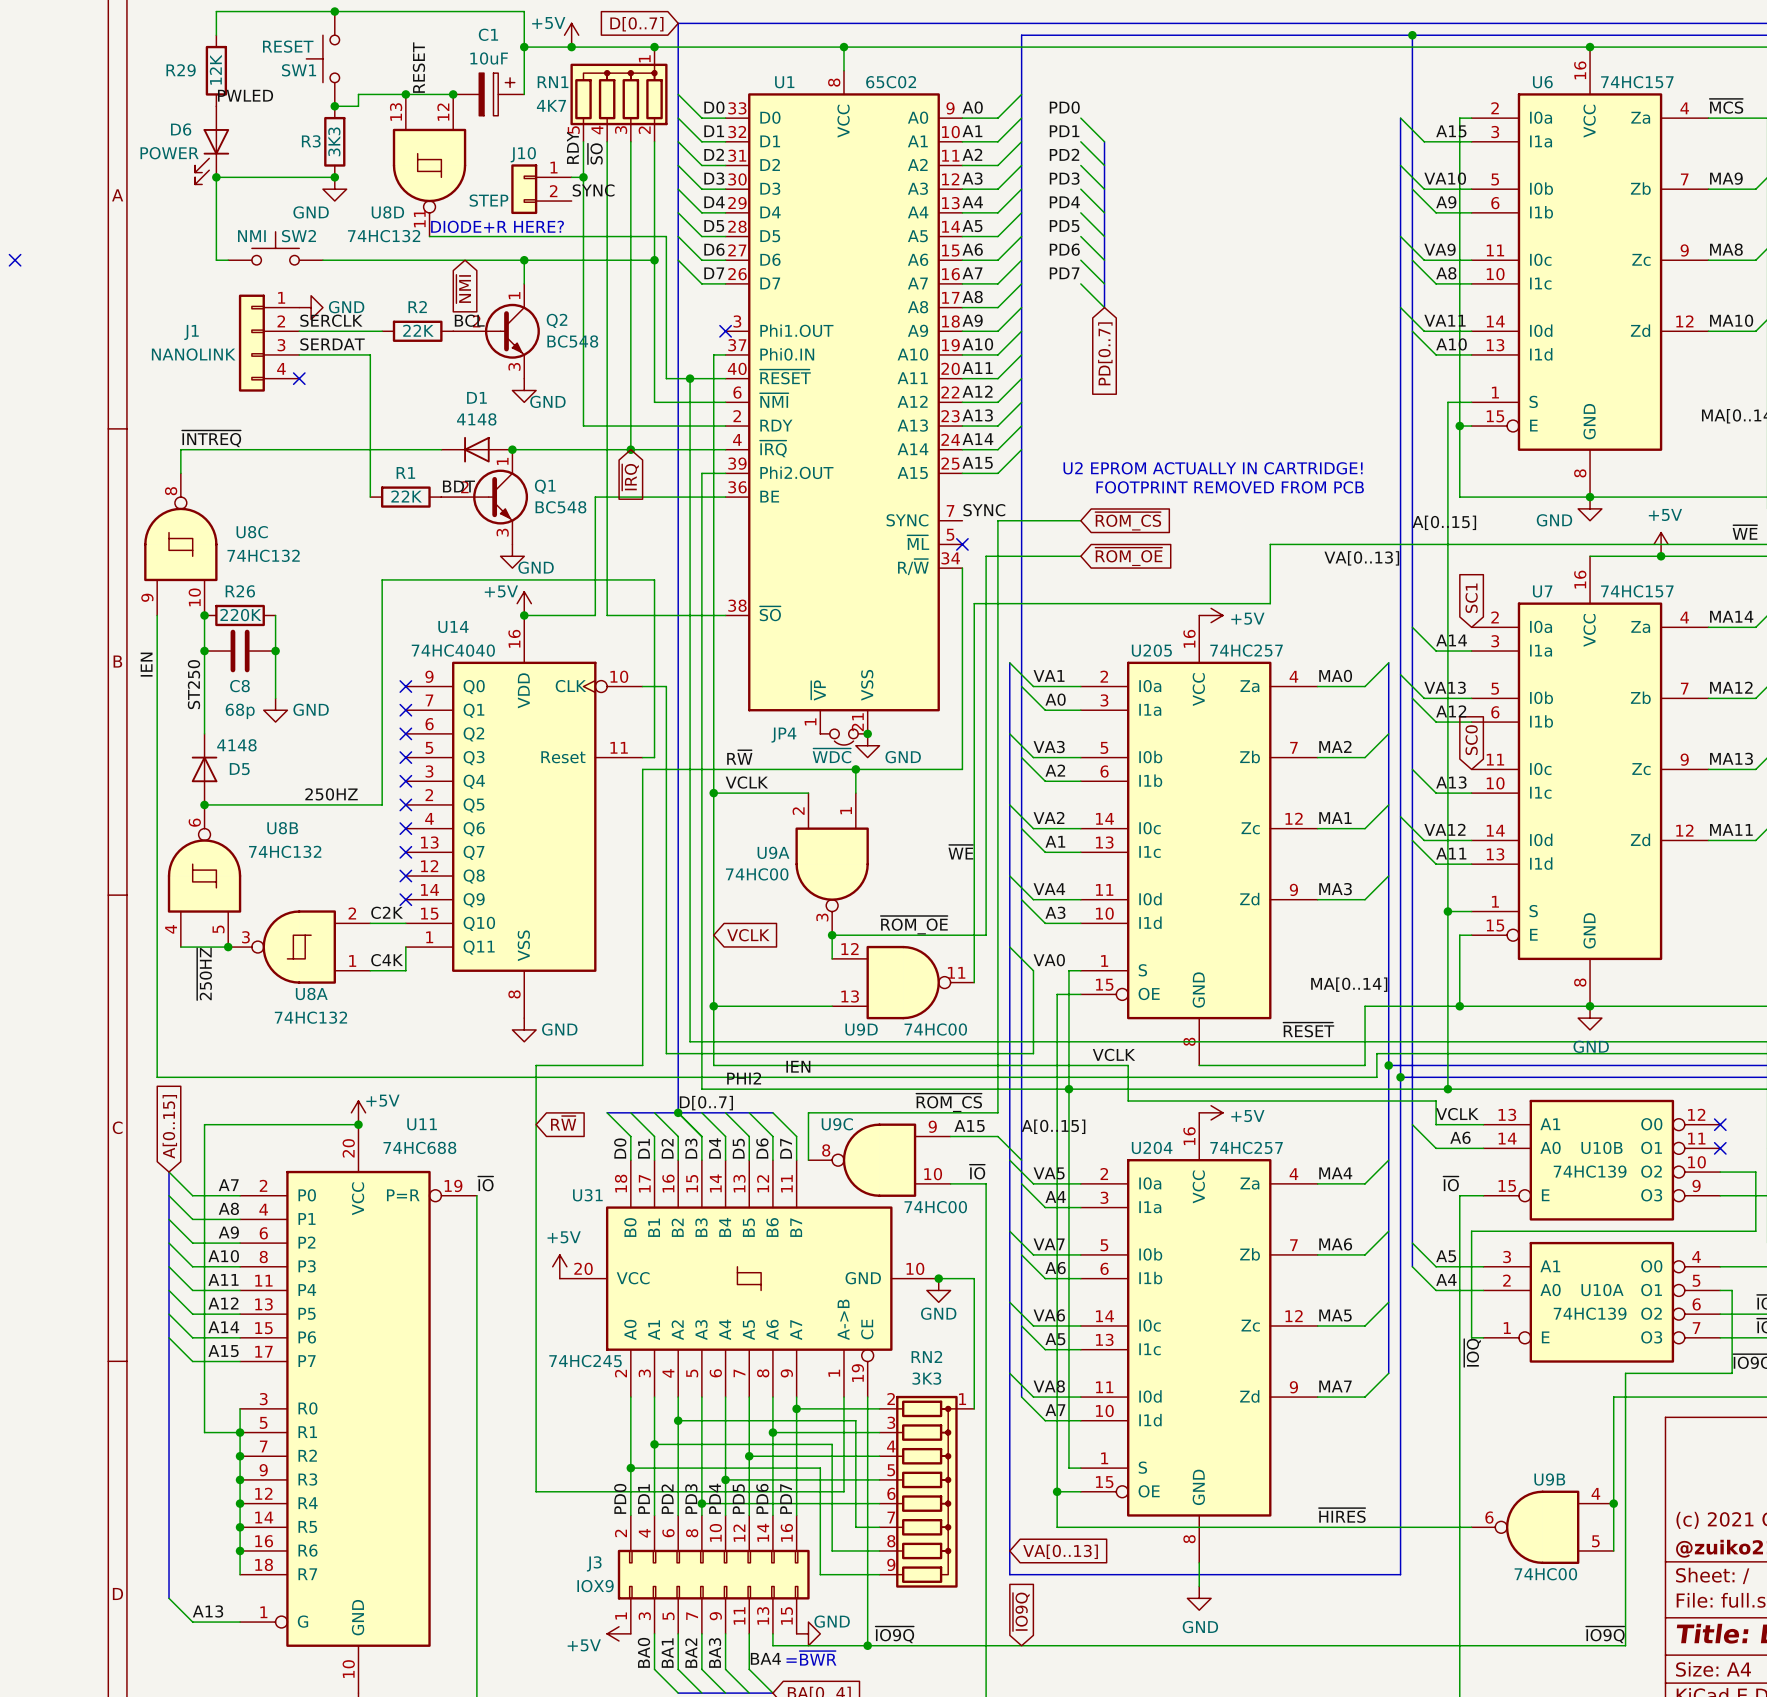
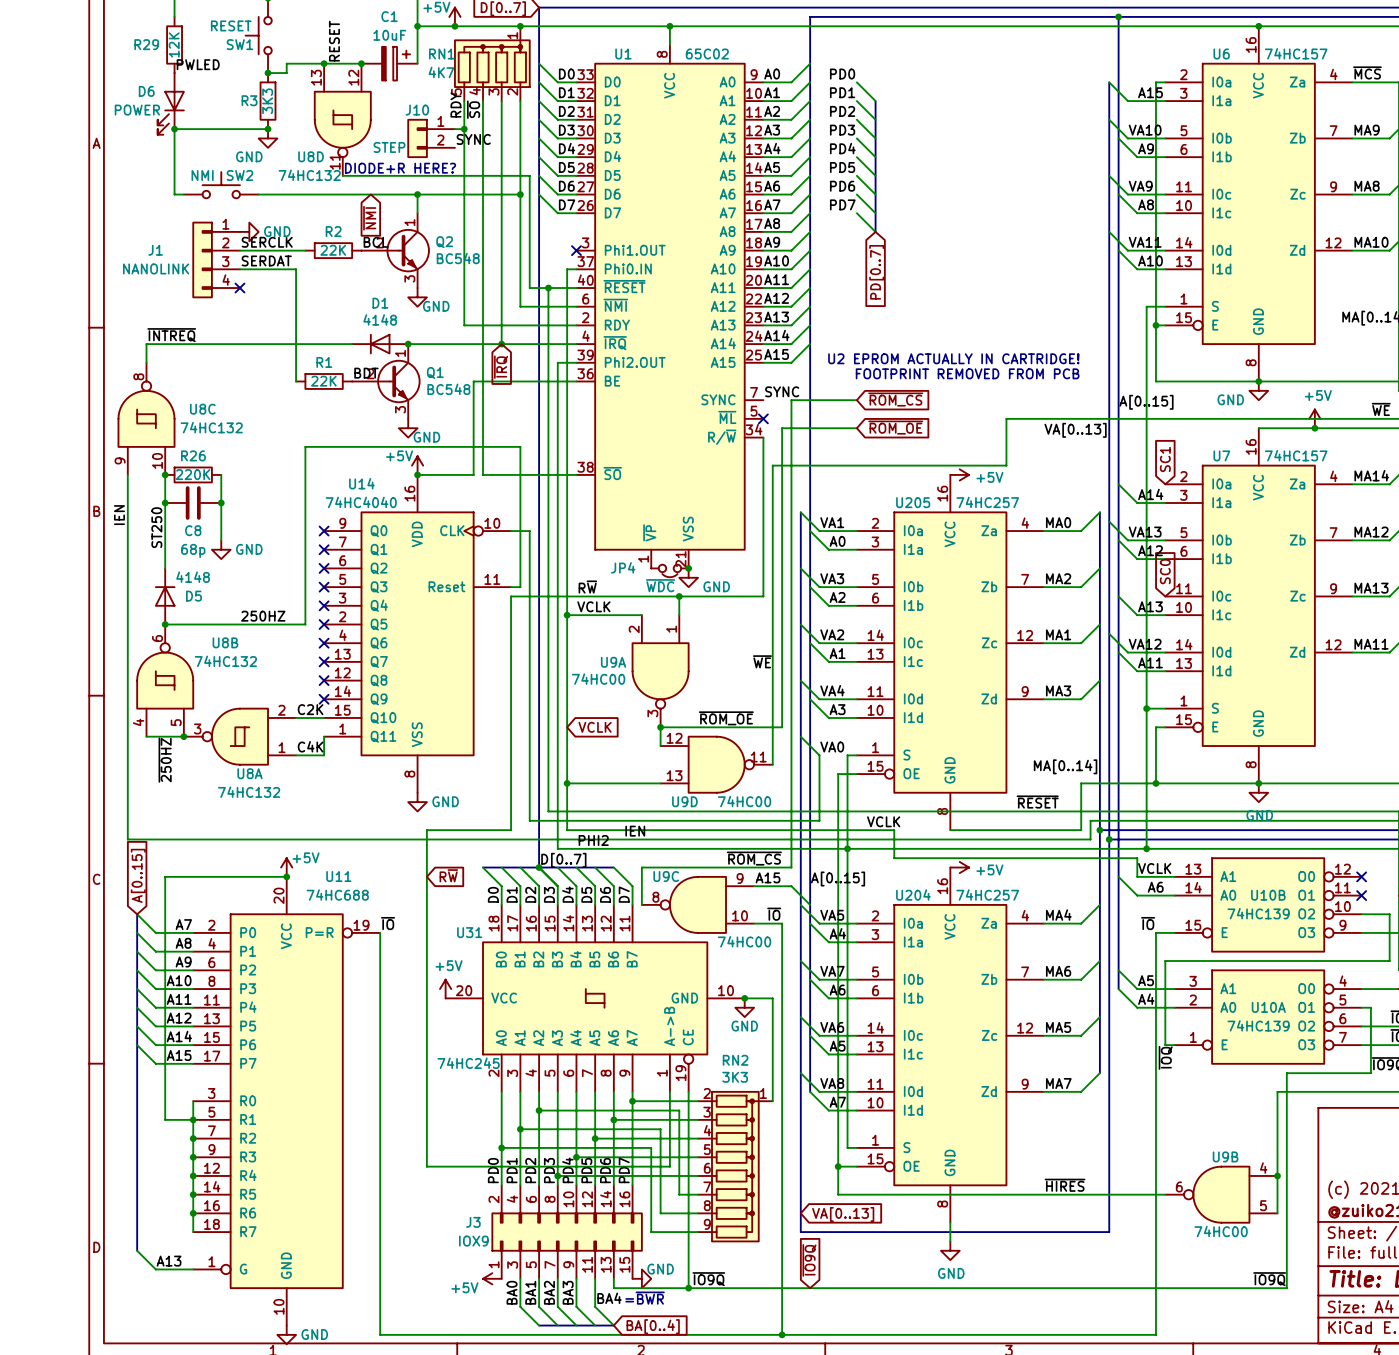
no-connect mark: (15, 260) -> none

